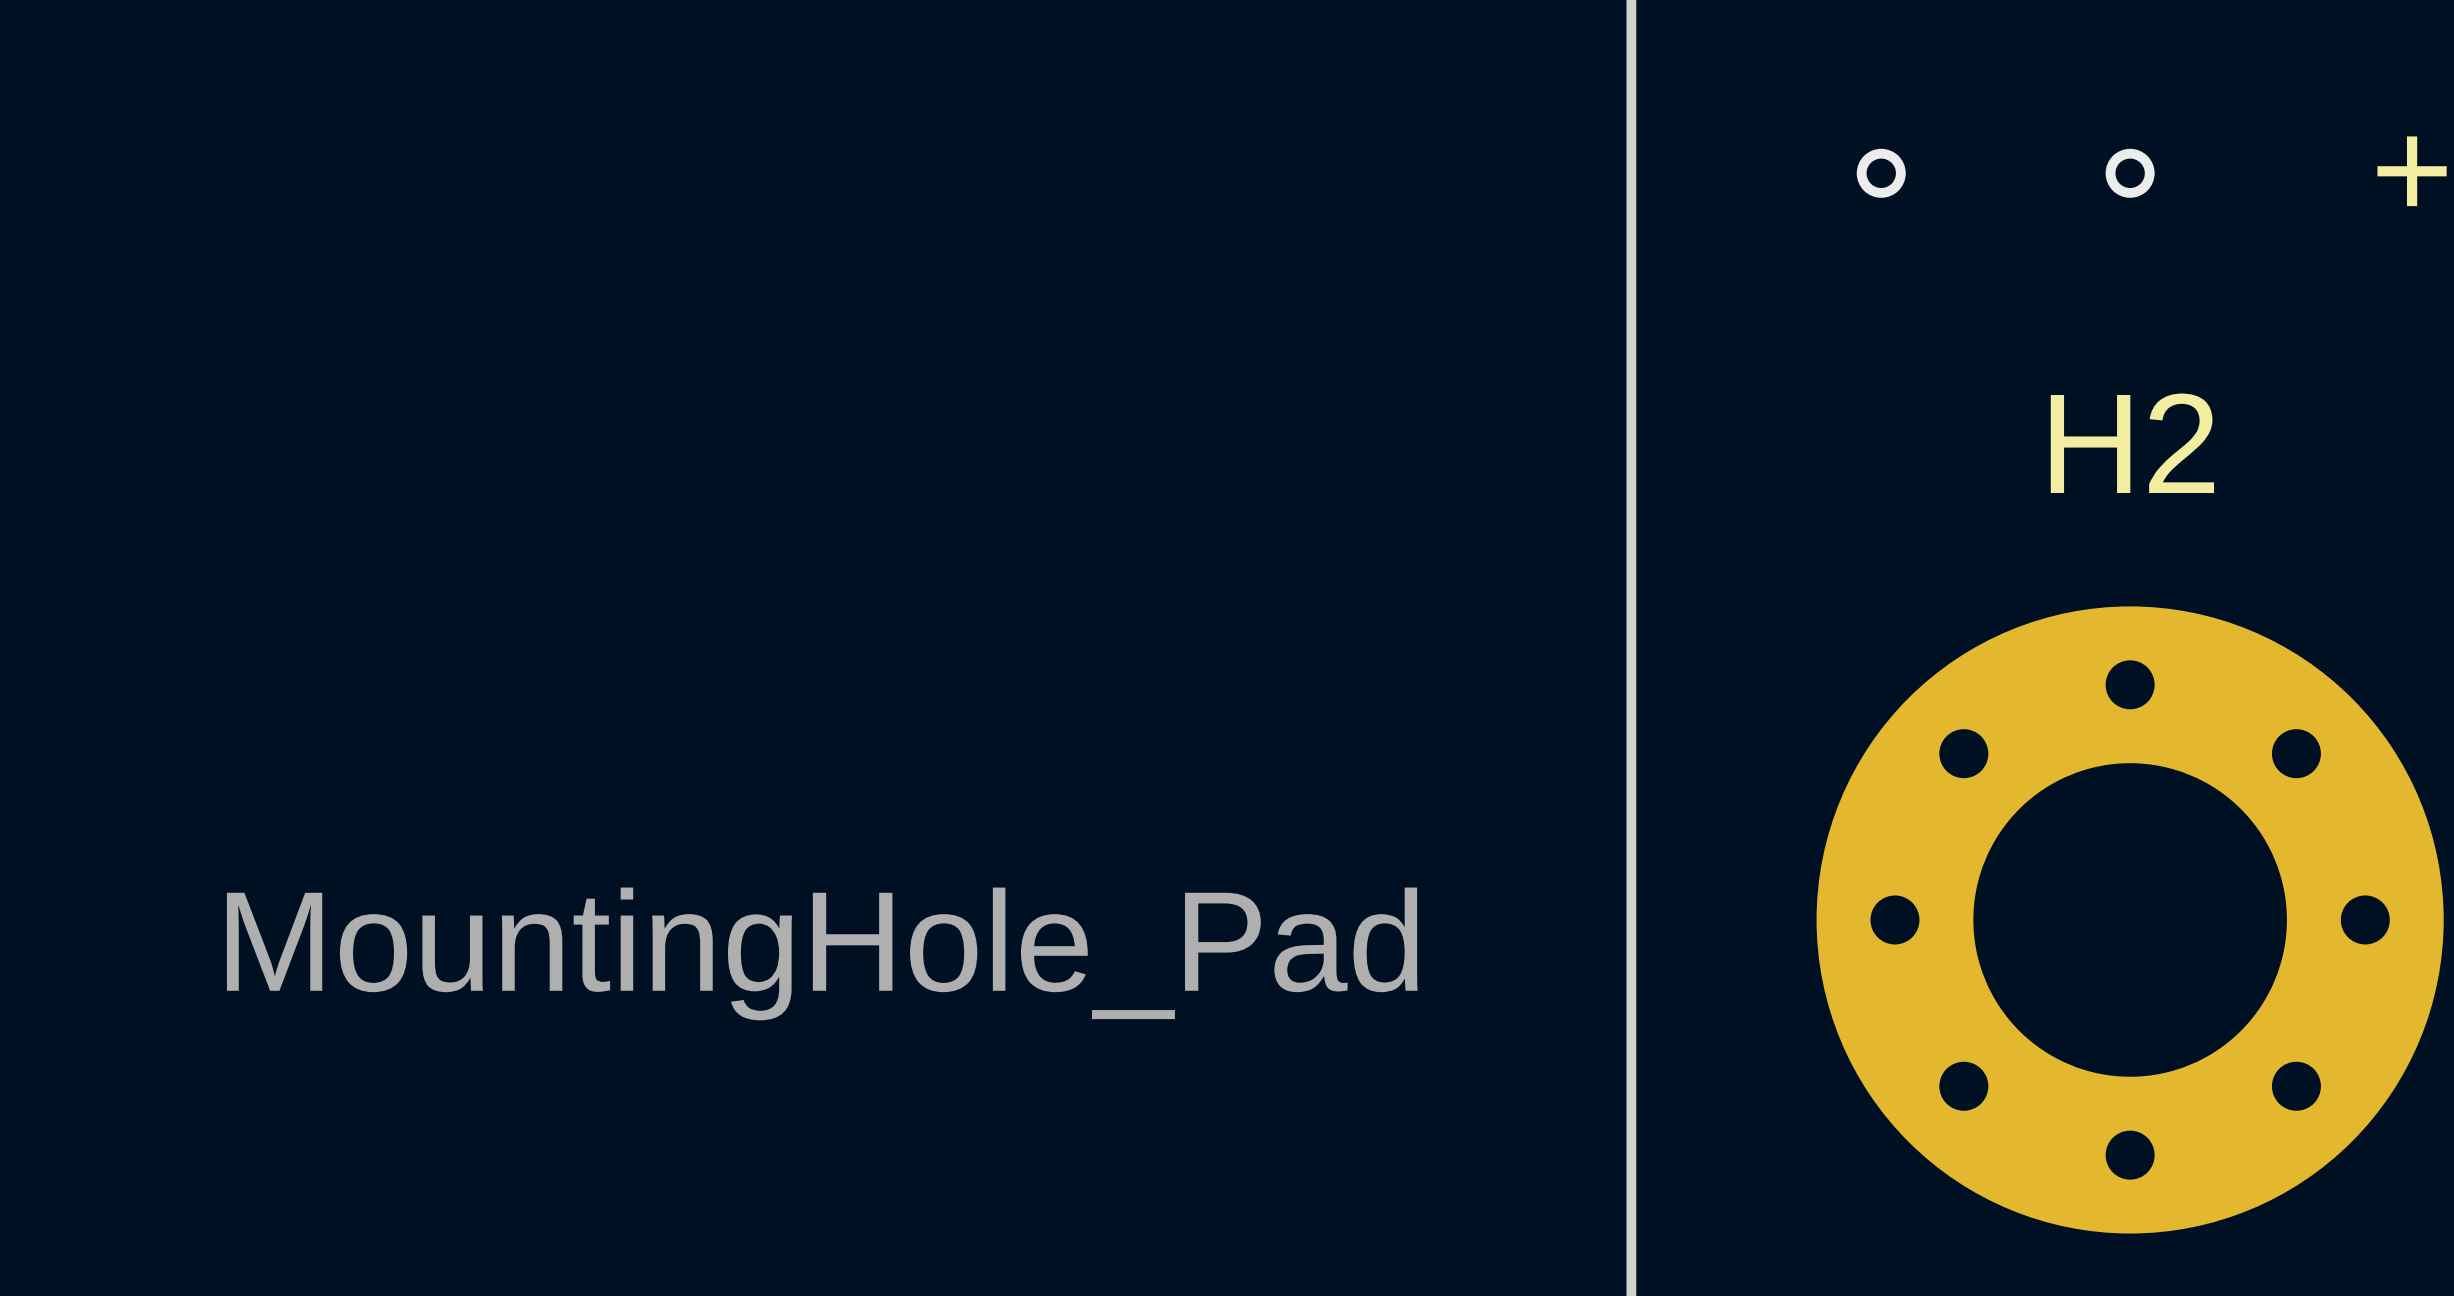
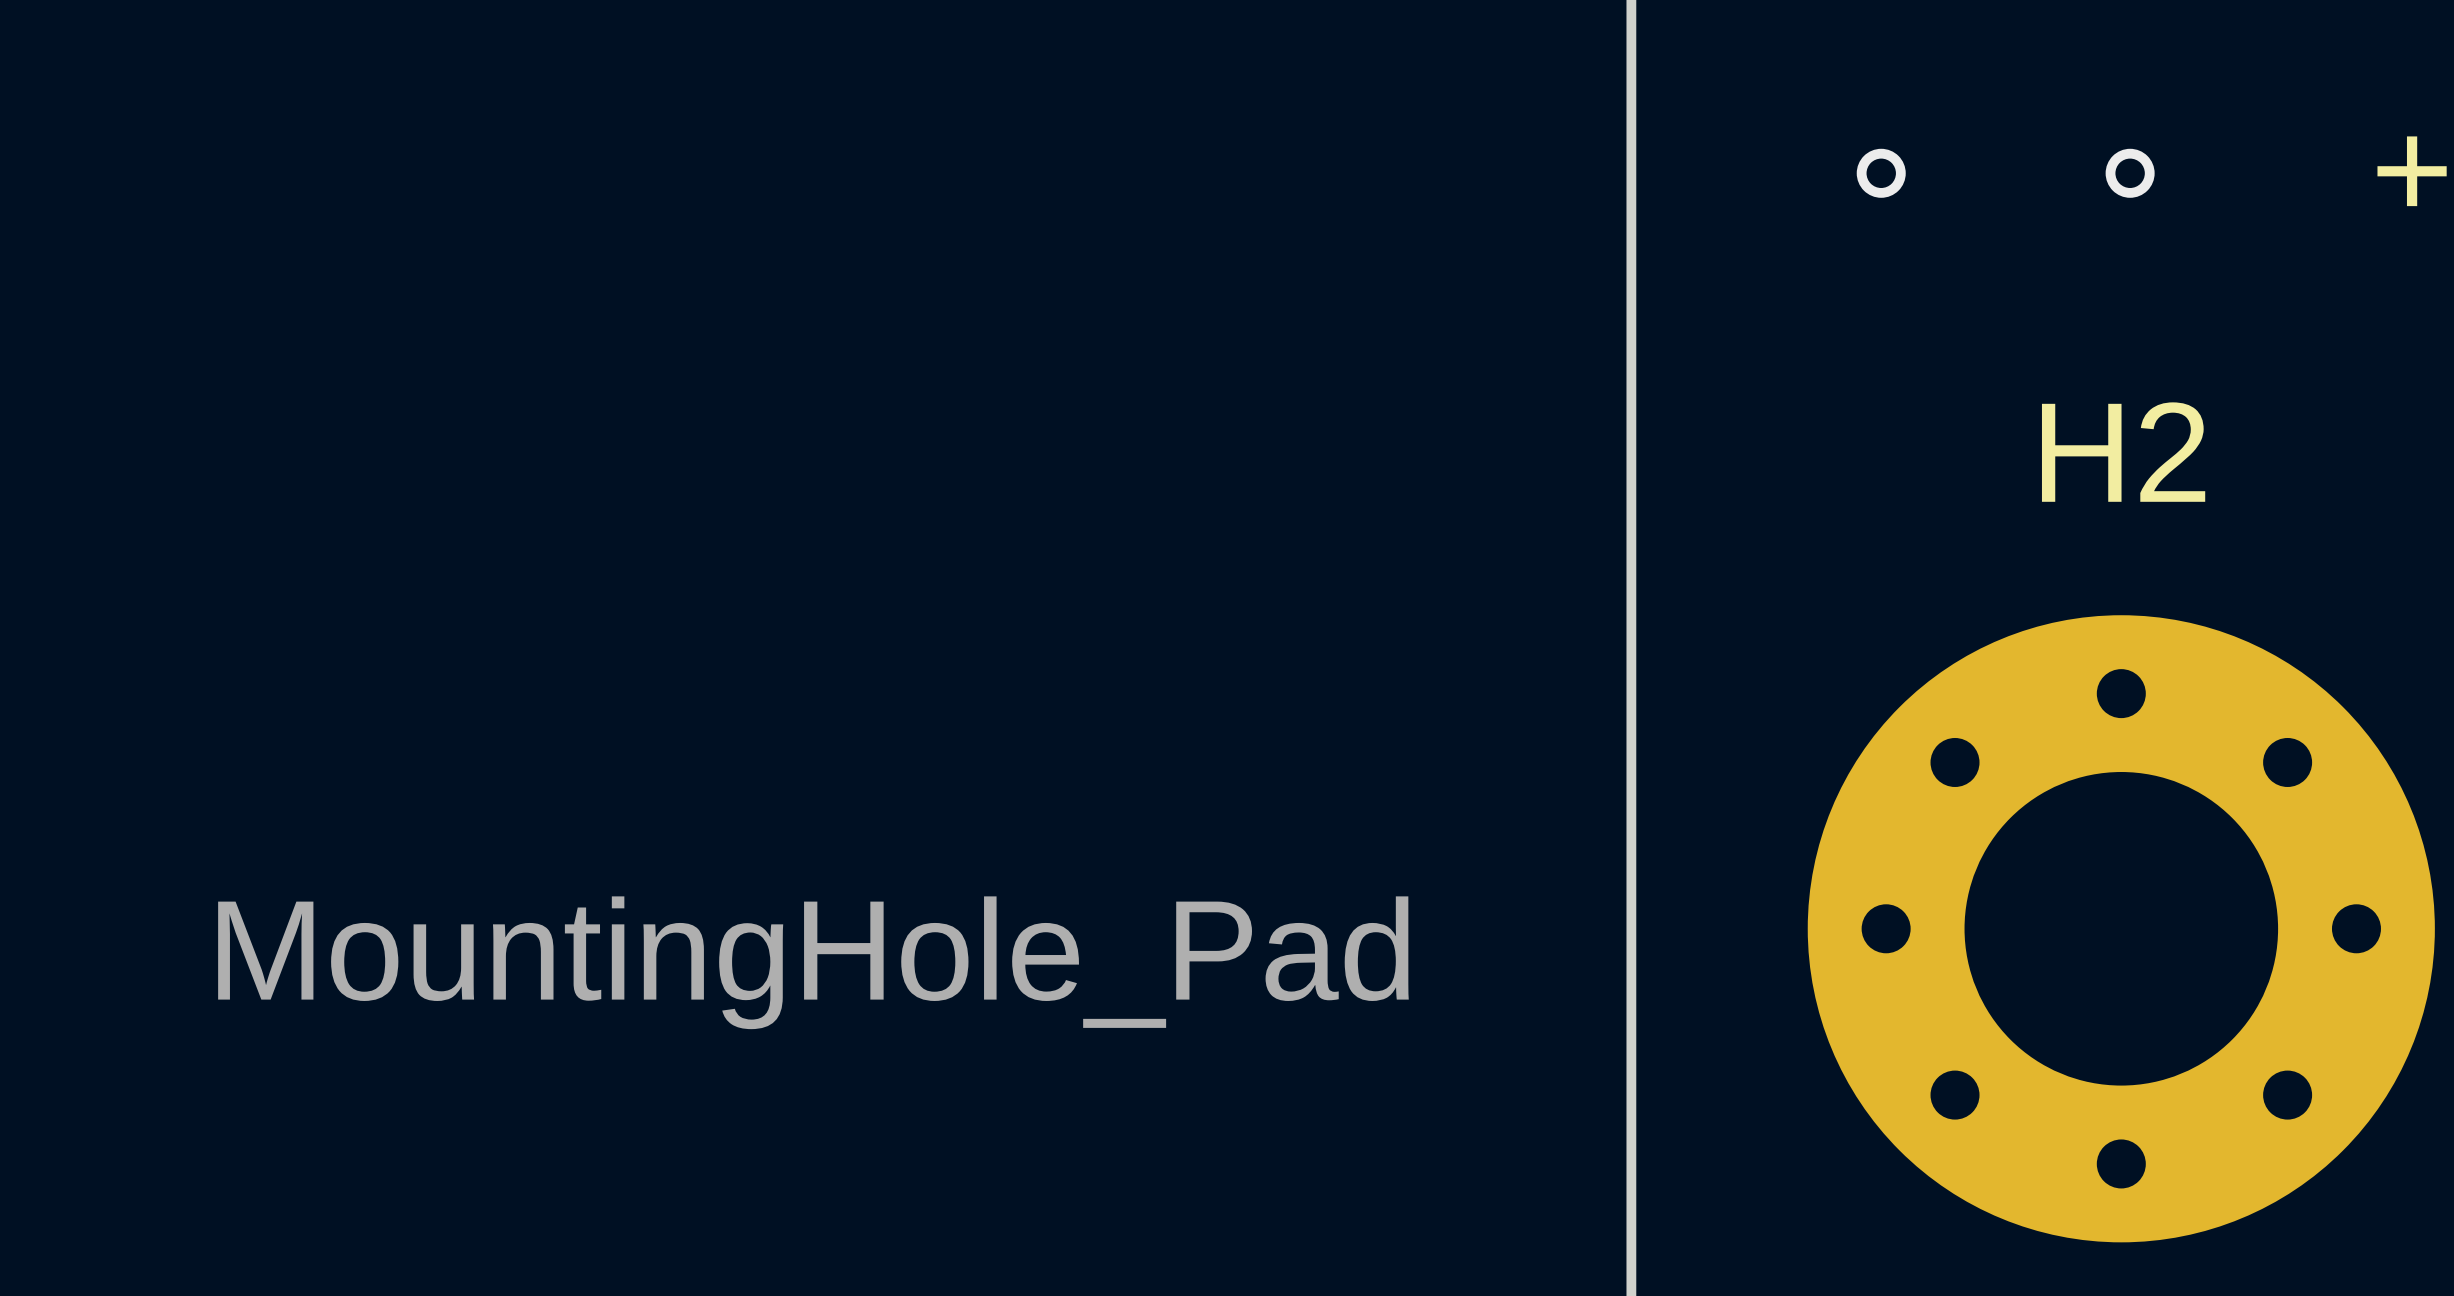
H2 position: (2130, 919) -> (2121, 928)

